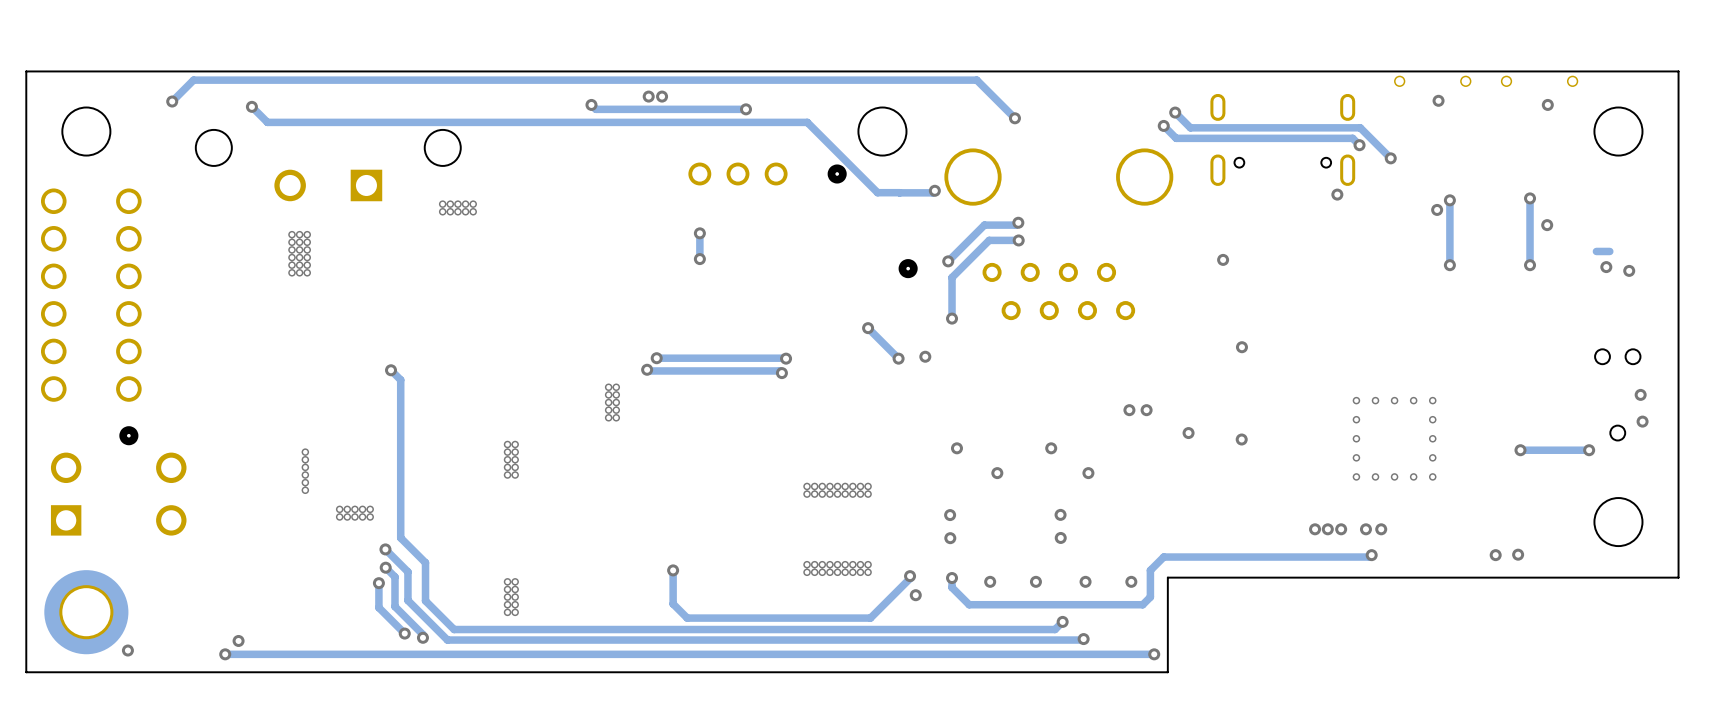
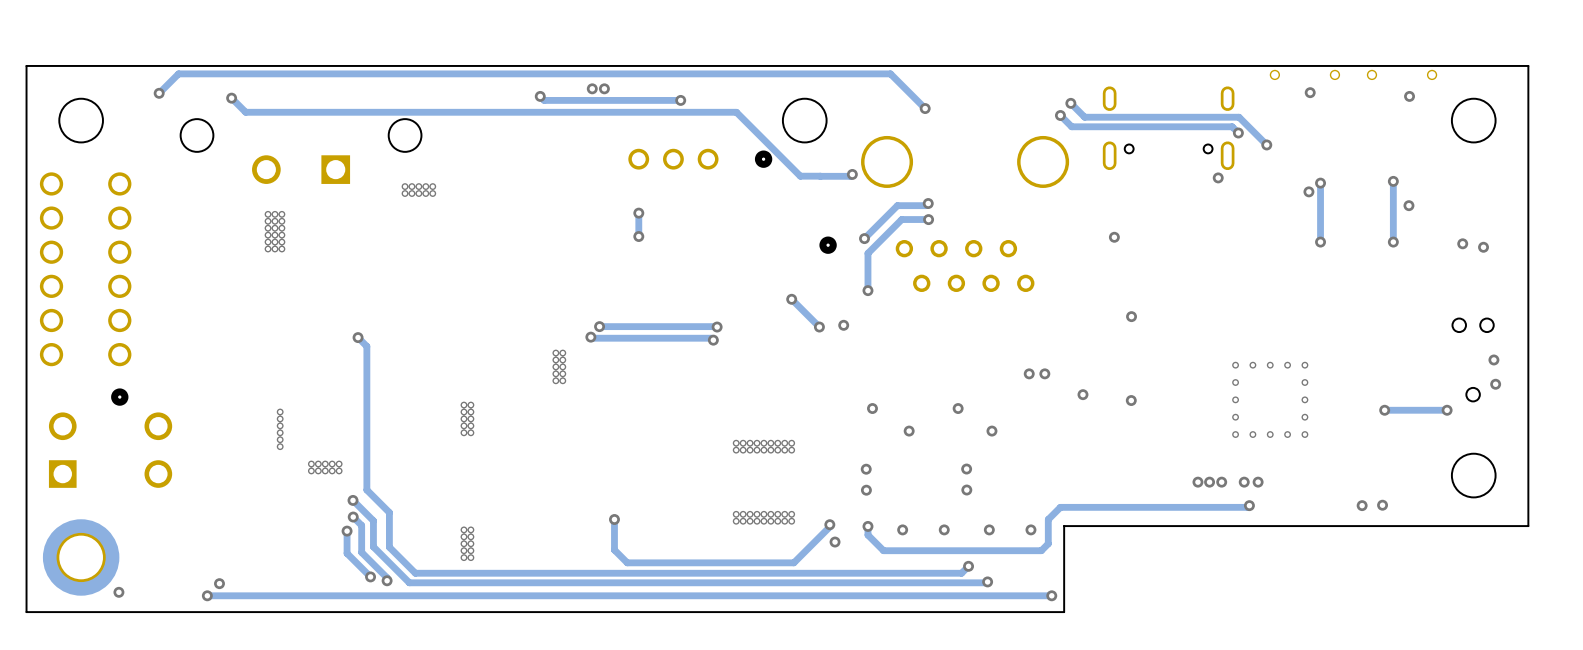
track: (1609, 251) (1596, 251) -> none

